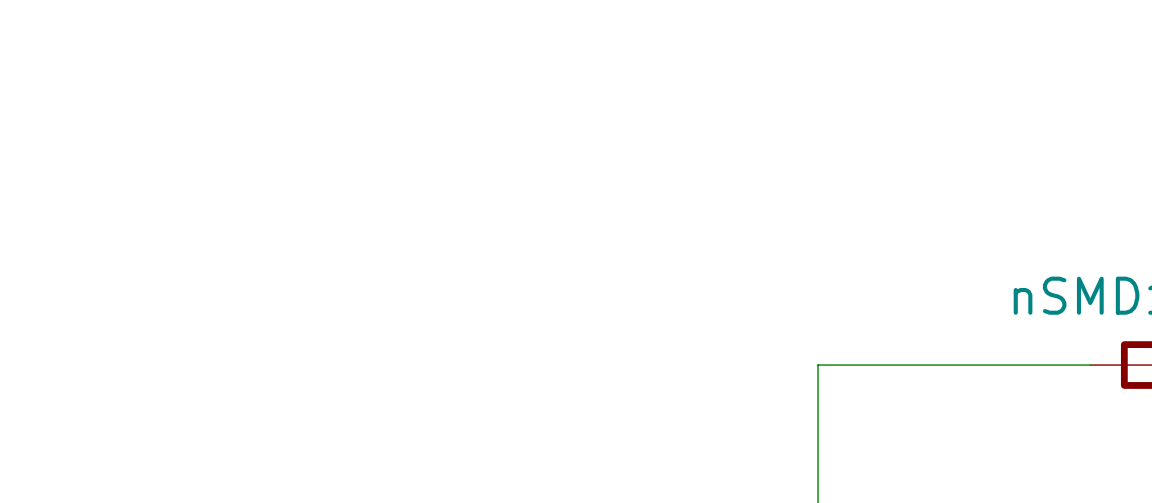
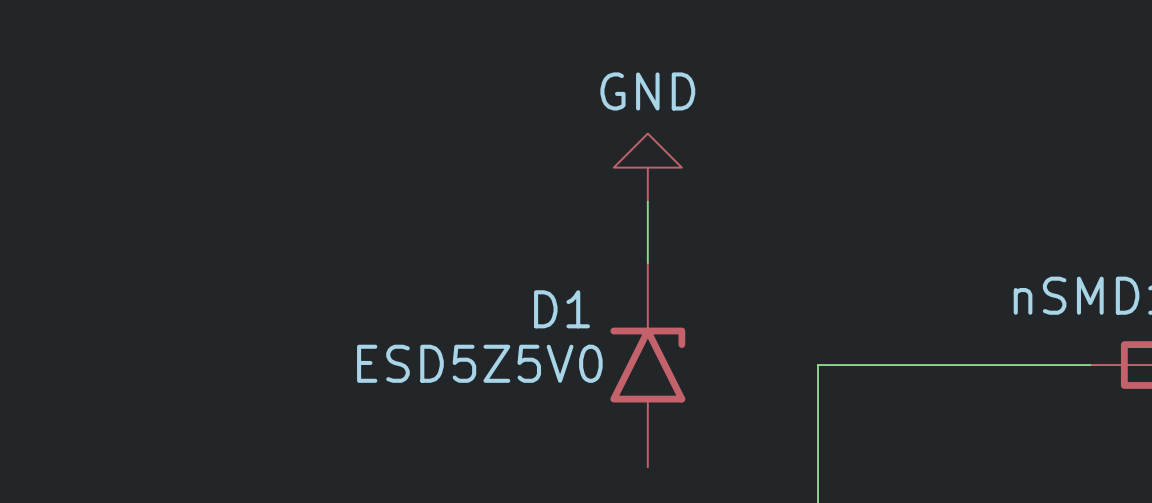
power symbol: none -> GND (647, 167)
wire: none -> (647, 201) (647, 262)
D1: none -> ESD5Z5V0 (647, 365)

